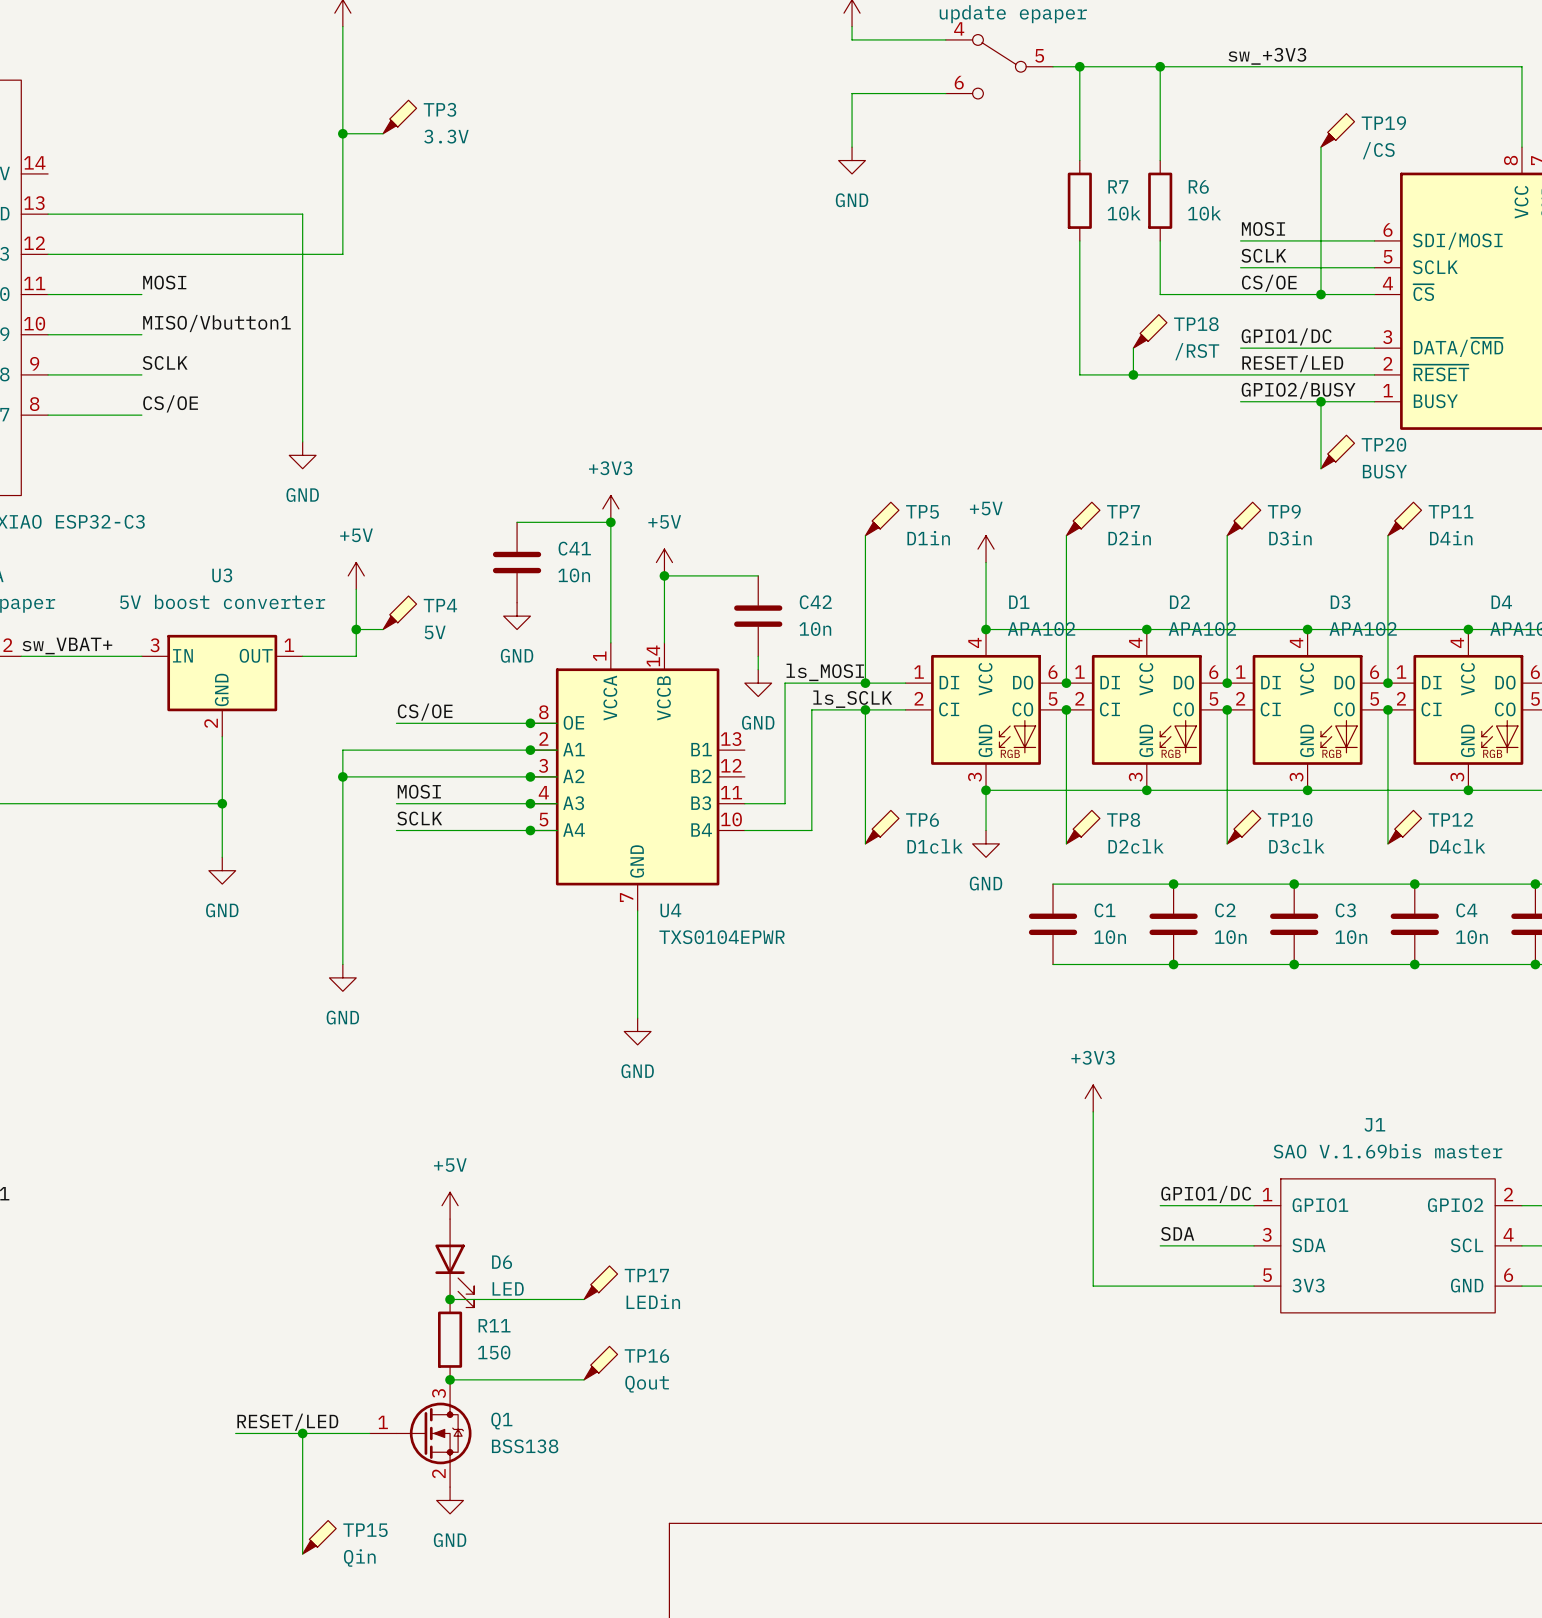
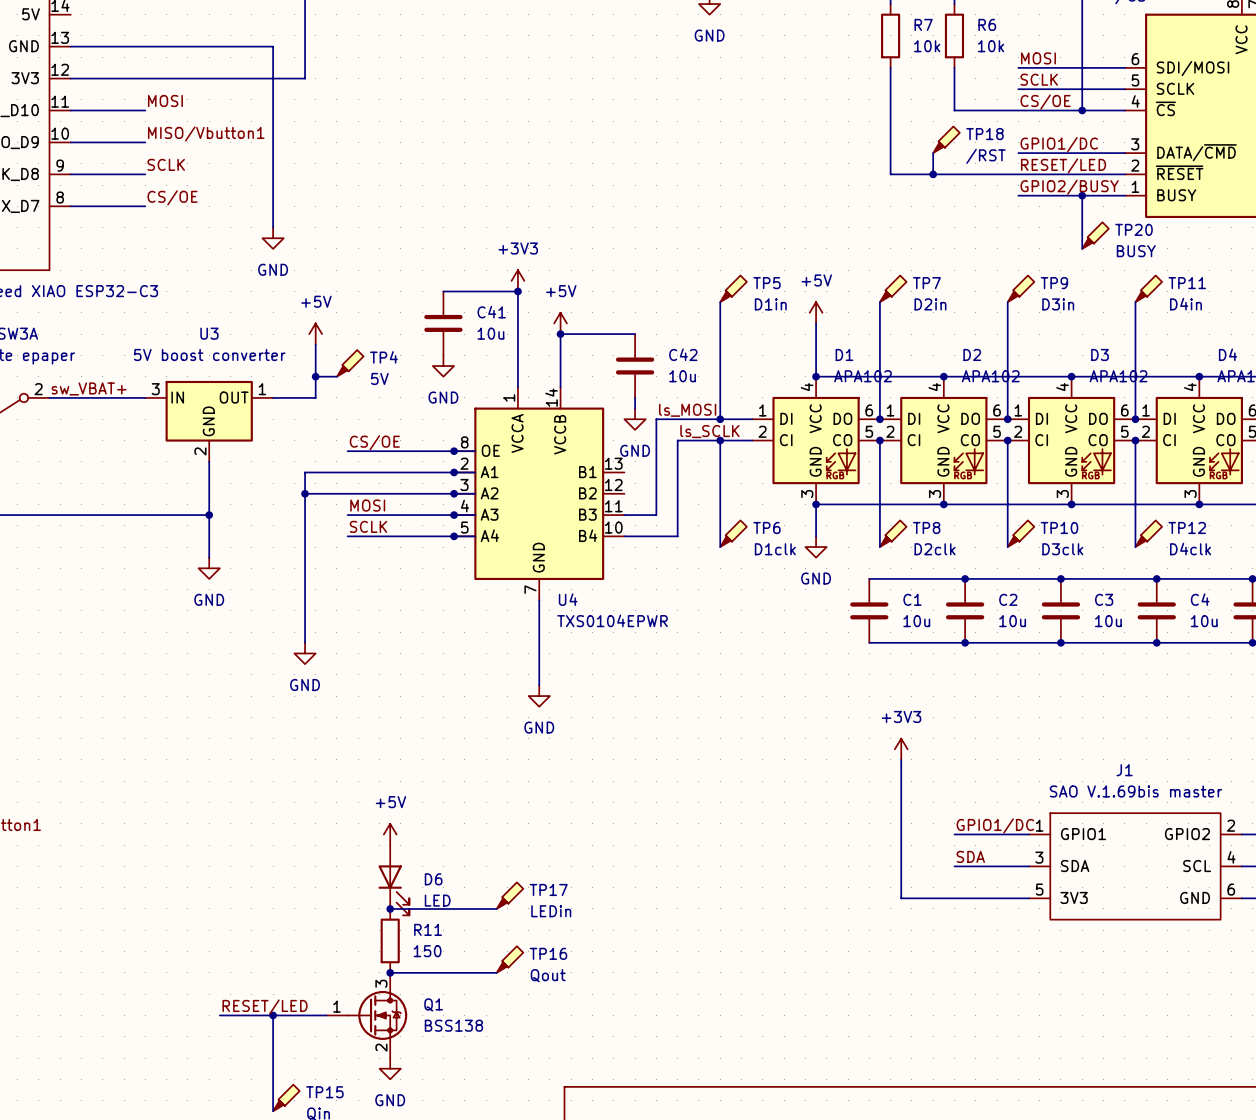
C41 value: 10n (574, 575) -> 10u (490, 333)
C42 value: 10n (815, 629) -> 10u (682, 376)
C1 value: 10n (1110, 937) -> 10u (916, 621)
C2 value: 10n (1230, 937) -> 10u (1012, 621)
C3 value: 10n (1351, 937) -> 10u (1108, 621)
C4 value: 10n (1471, 937) -> 10u (1204, 621)

